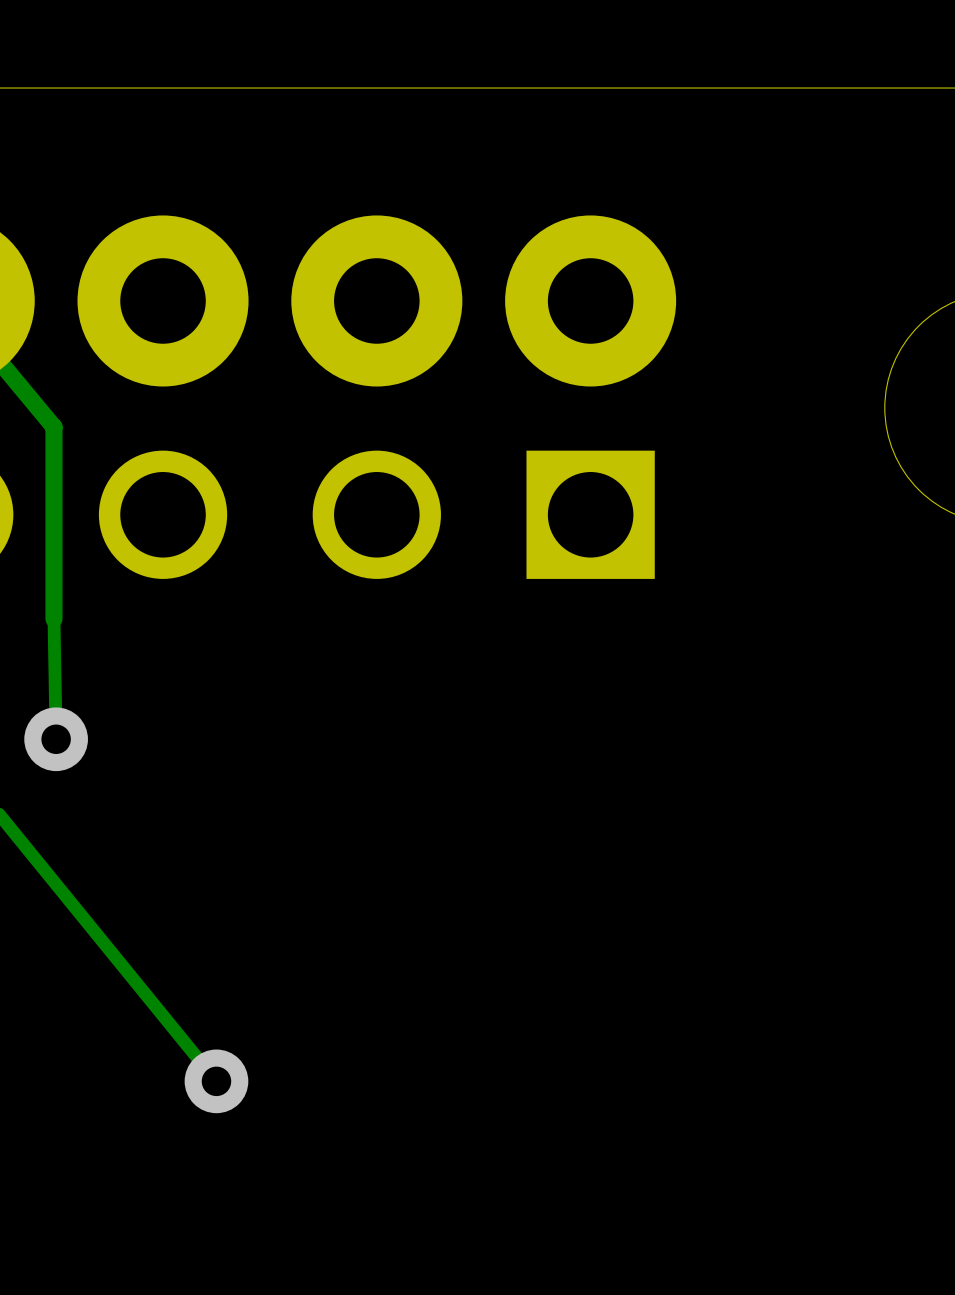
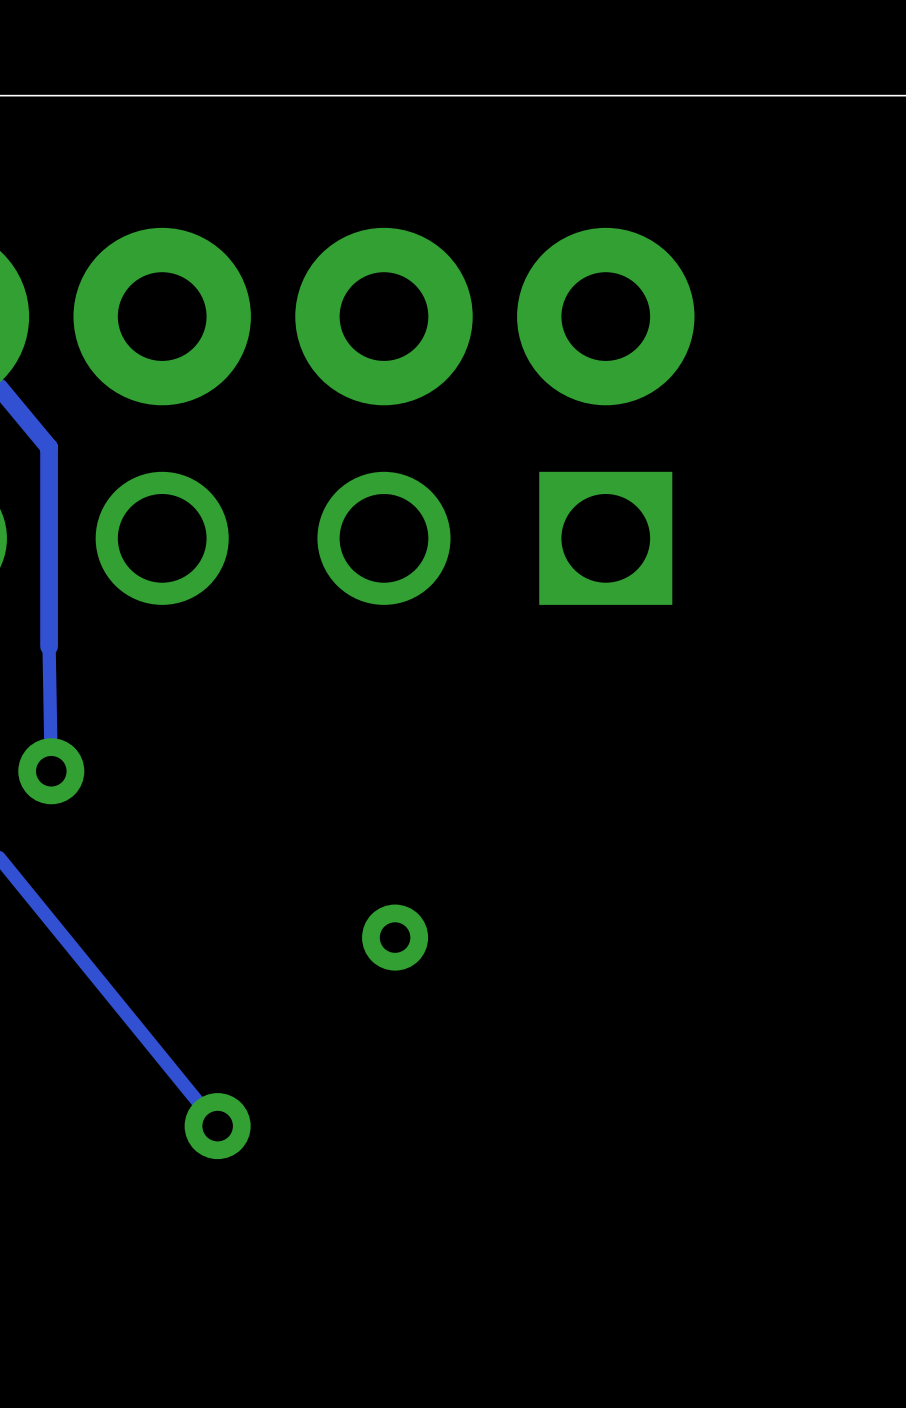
via: none -> (395, 937)

